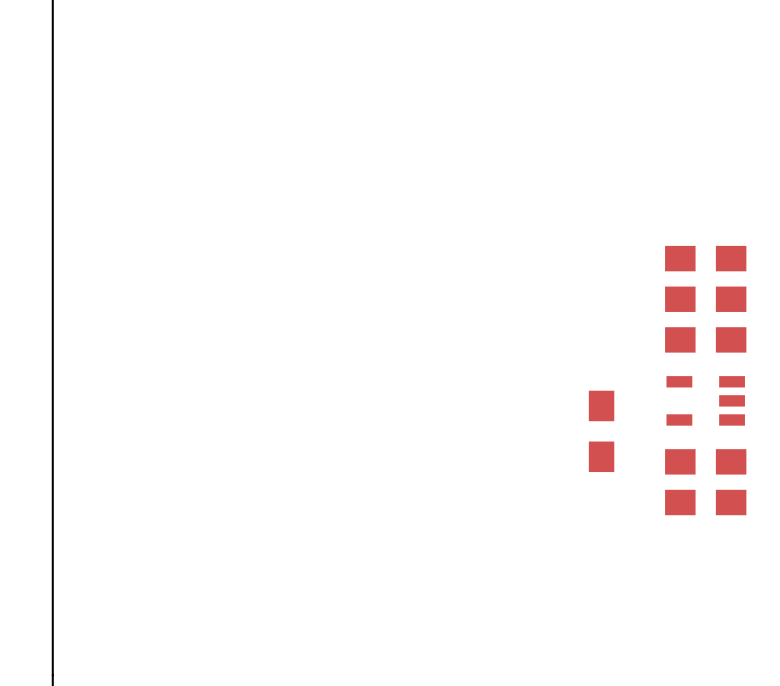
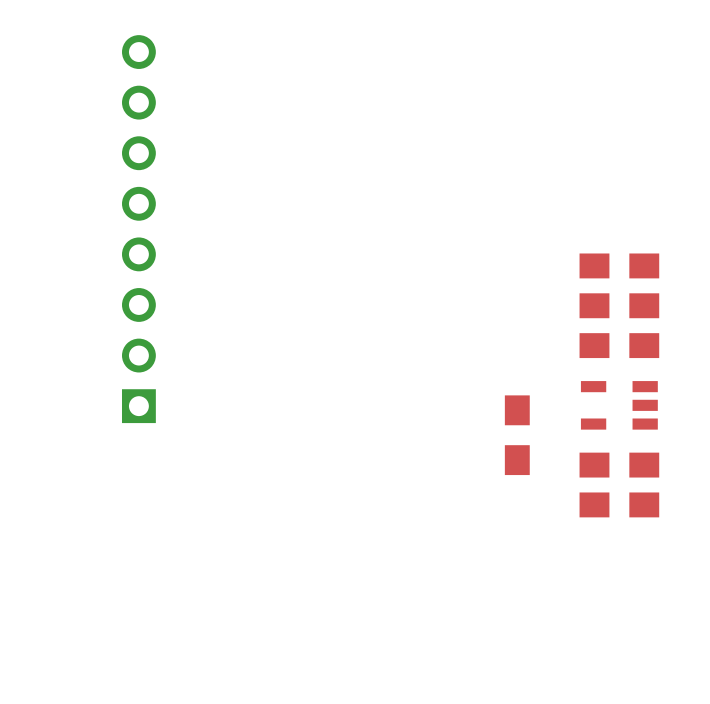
part: none -> (138, 229)

